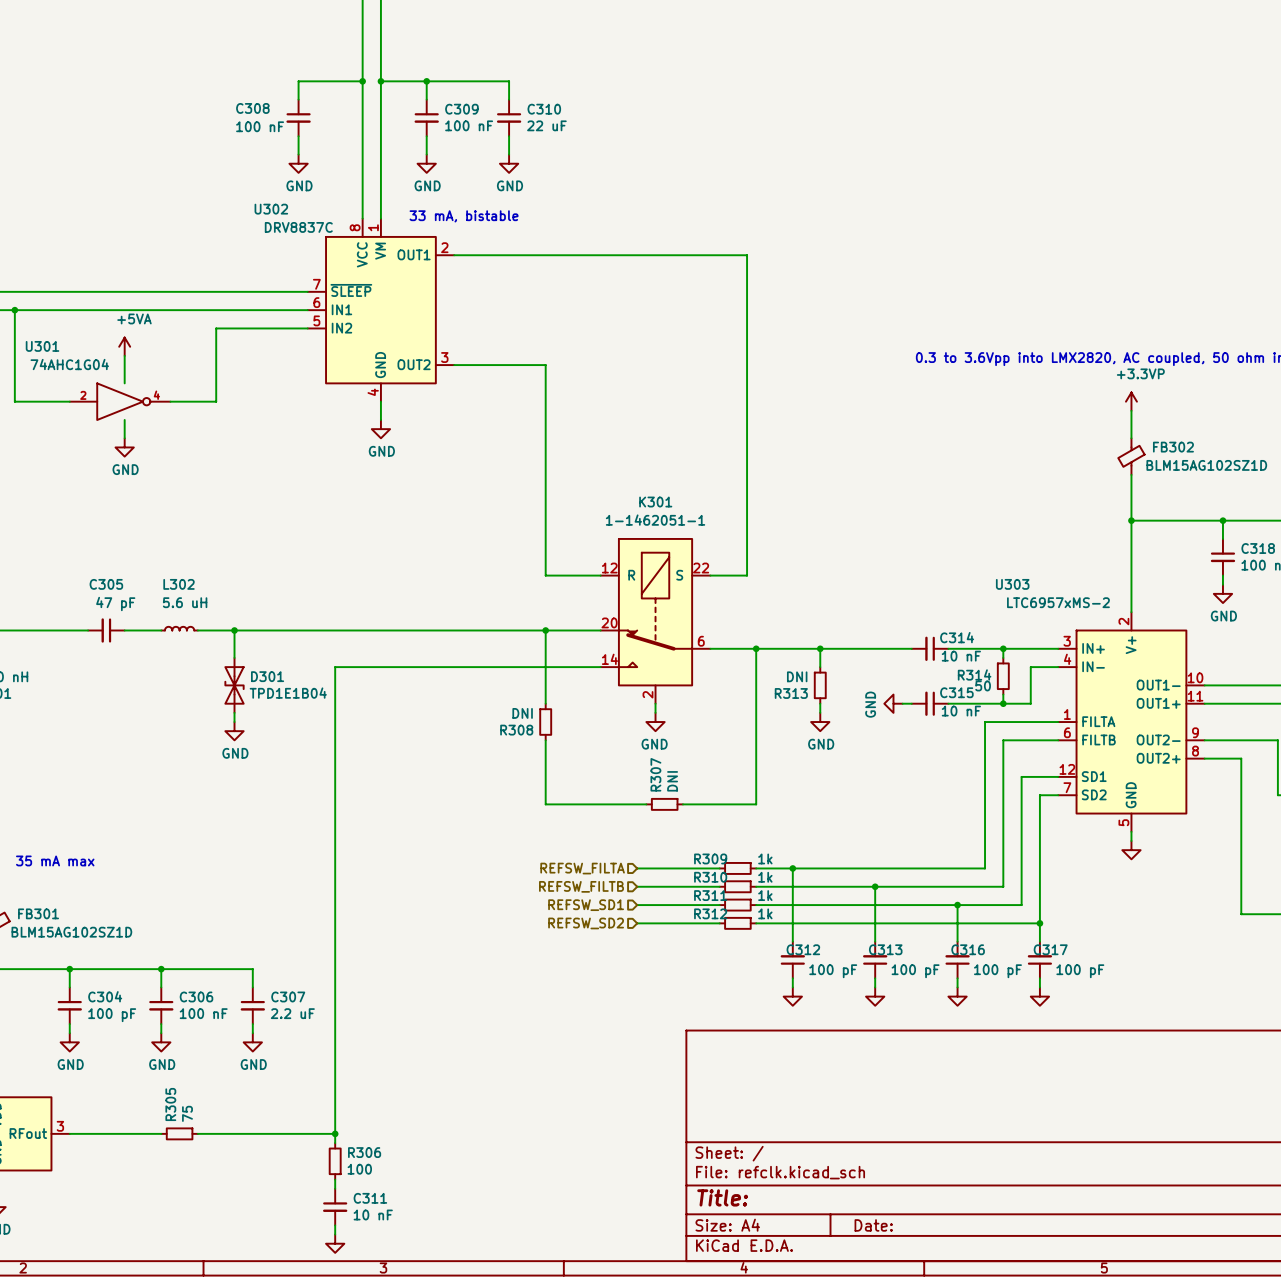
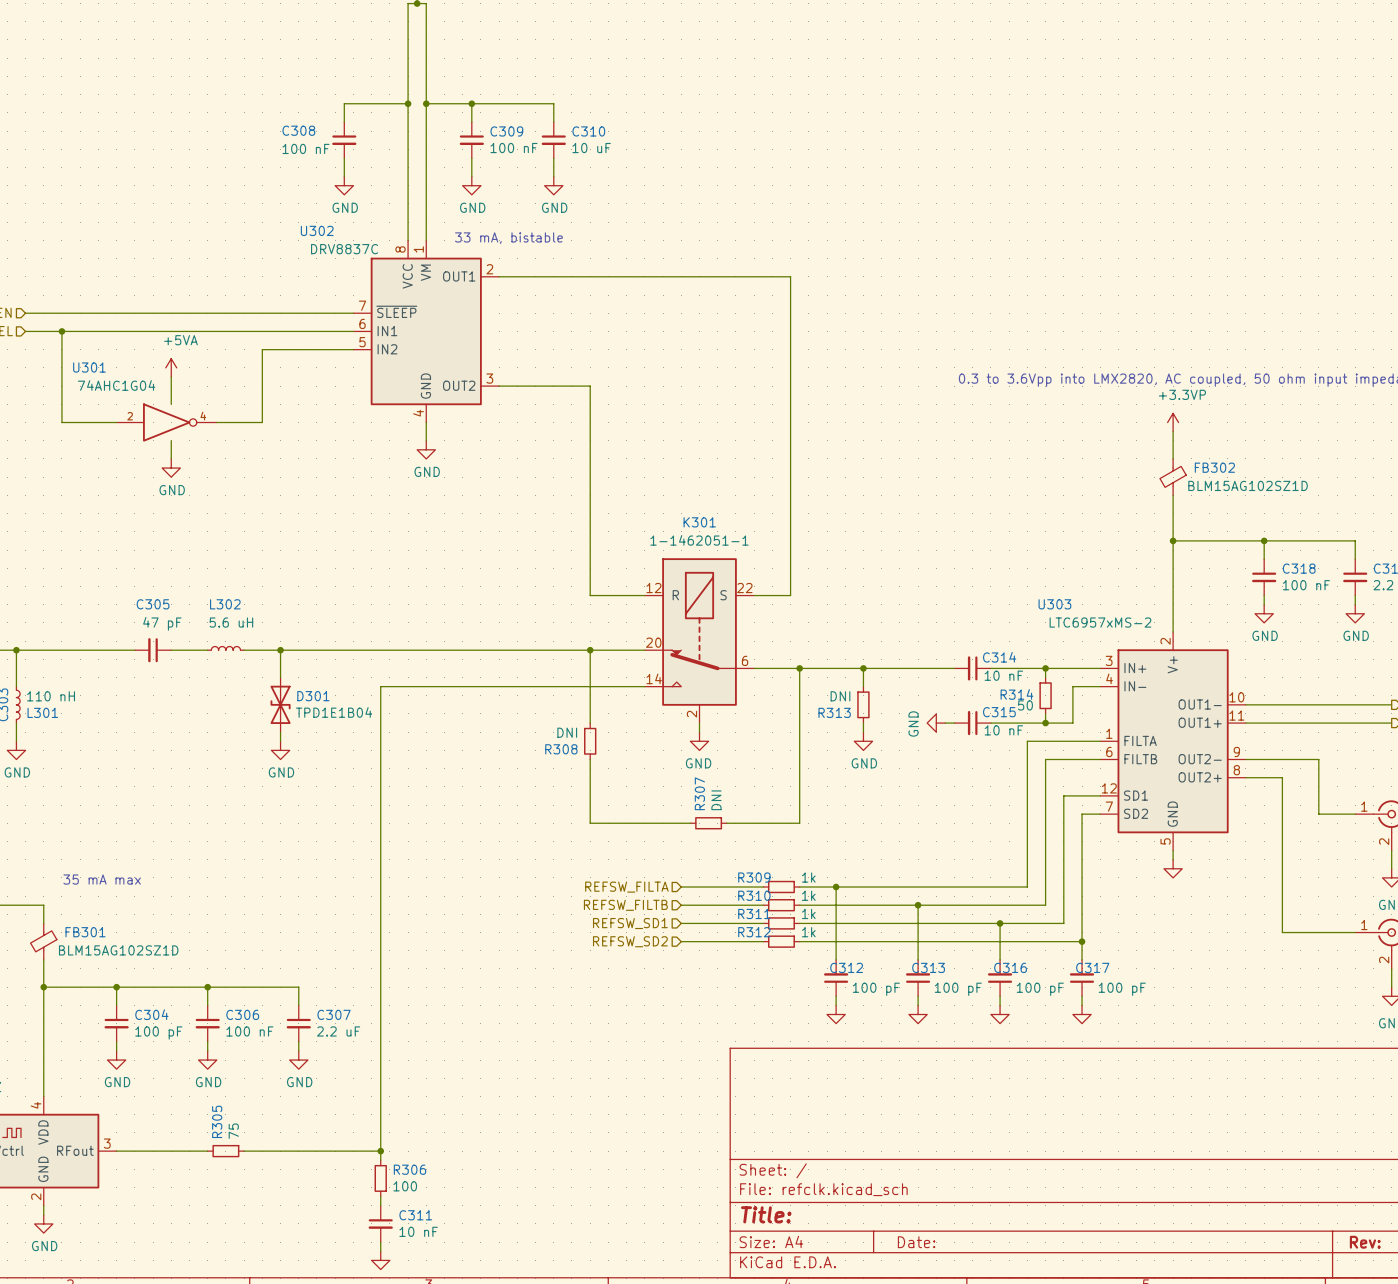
C310 value: 22 uF (546, 125) -> 10 uF (591, 148)

